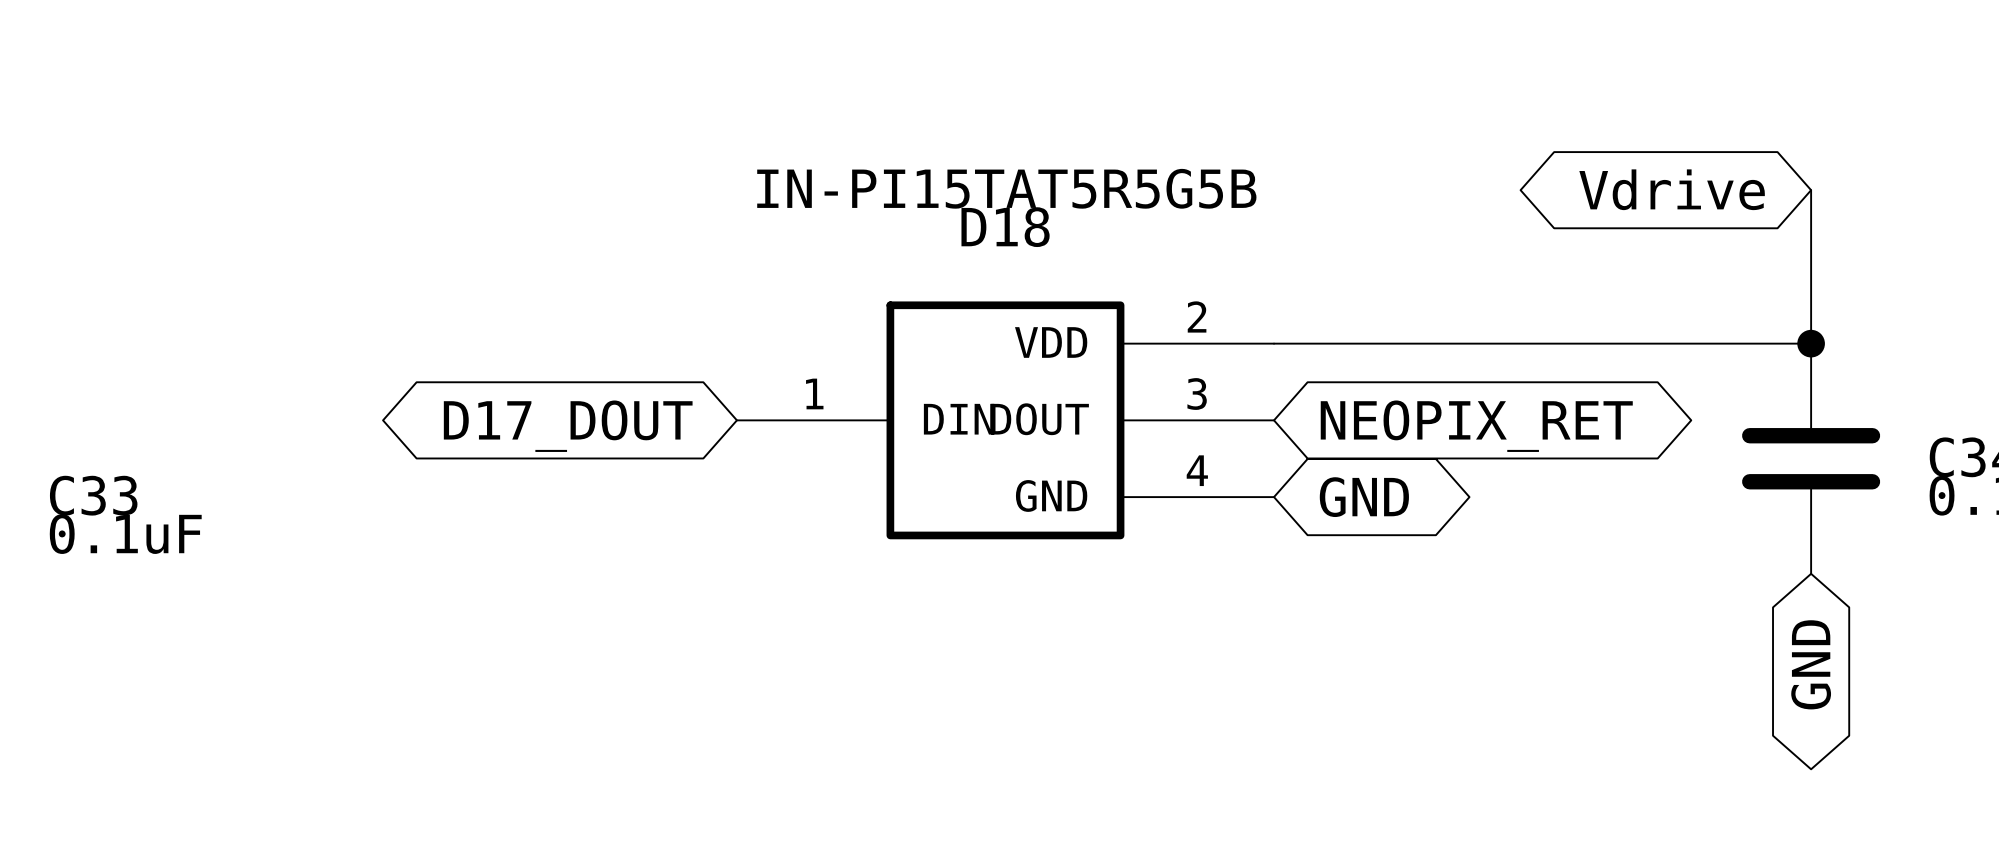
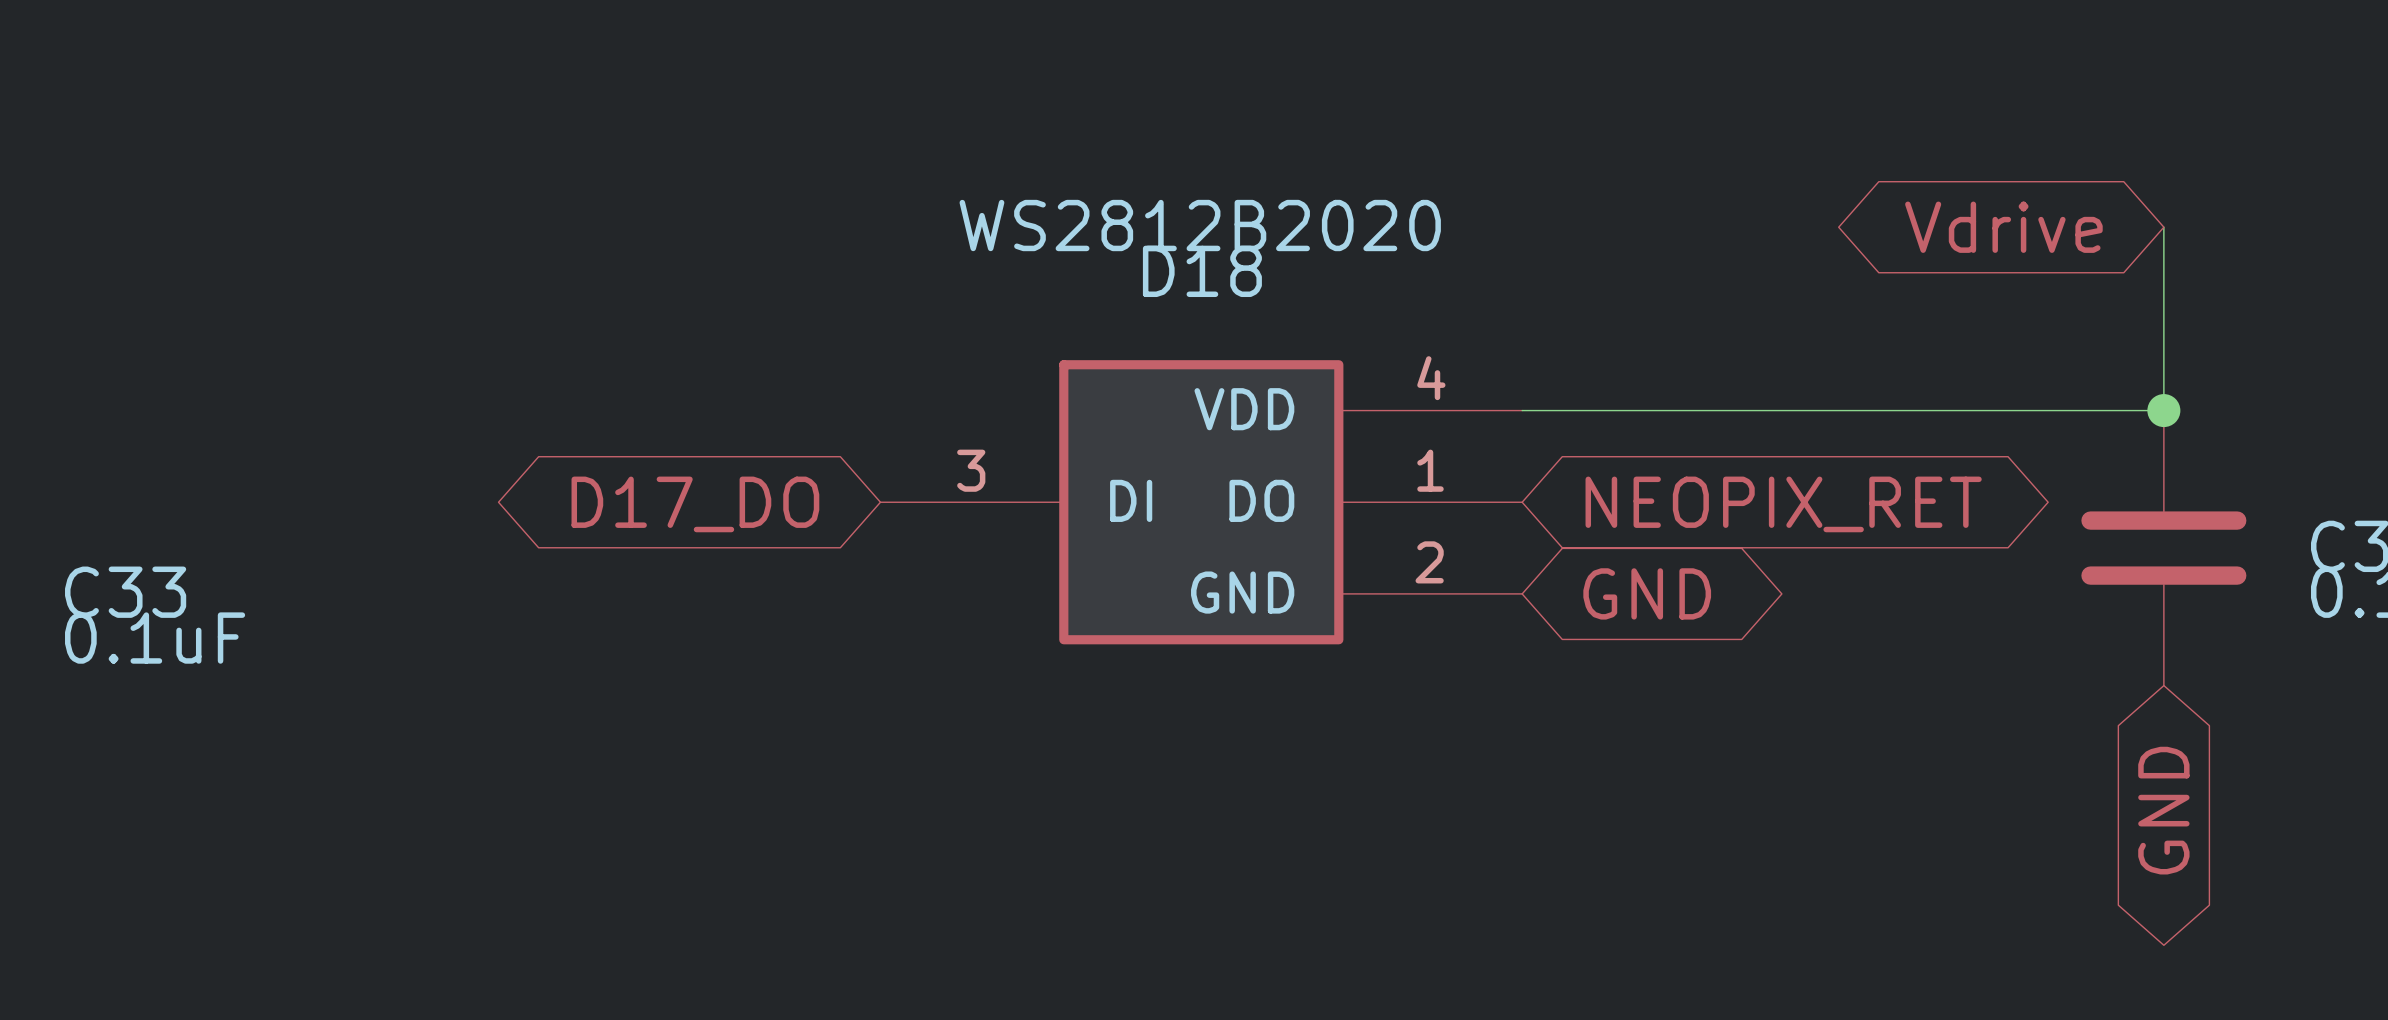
D18 value: IN-PI15TAT5R5G5B (1006, 188) -> WS2812B2020 (1200, 225)
D18 pin number: 2 (1197, 316) -> 4 (1431, 378)
D18 pin number: 1 (814, 393) -> 3 (971, 470)
D18 pin number: 3 (1197, 394) -> 1 (1430, 470)
D18 pin name: DIN (959, 419) -> DI (1131, 500)
D18 pin name: DOUT (1040, 419) -> DO (1261, 500)
global label: D17_DOUT (568, 426) -> D17_DO (695, 504)
D18 pin number: 4 (1197, 470) -> 2 (1429, 562)

